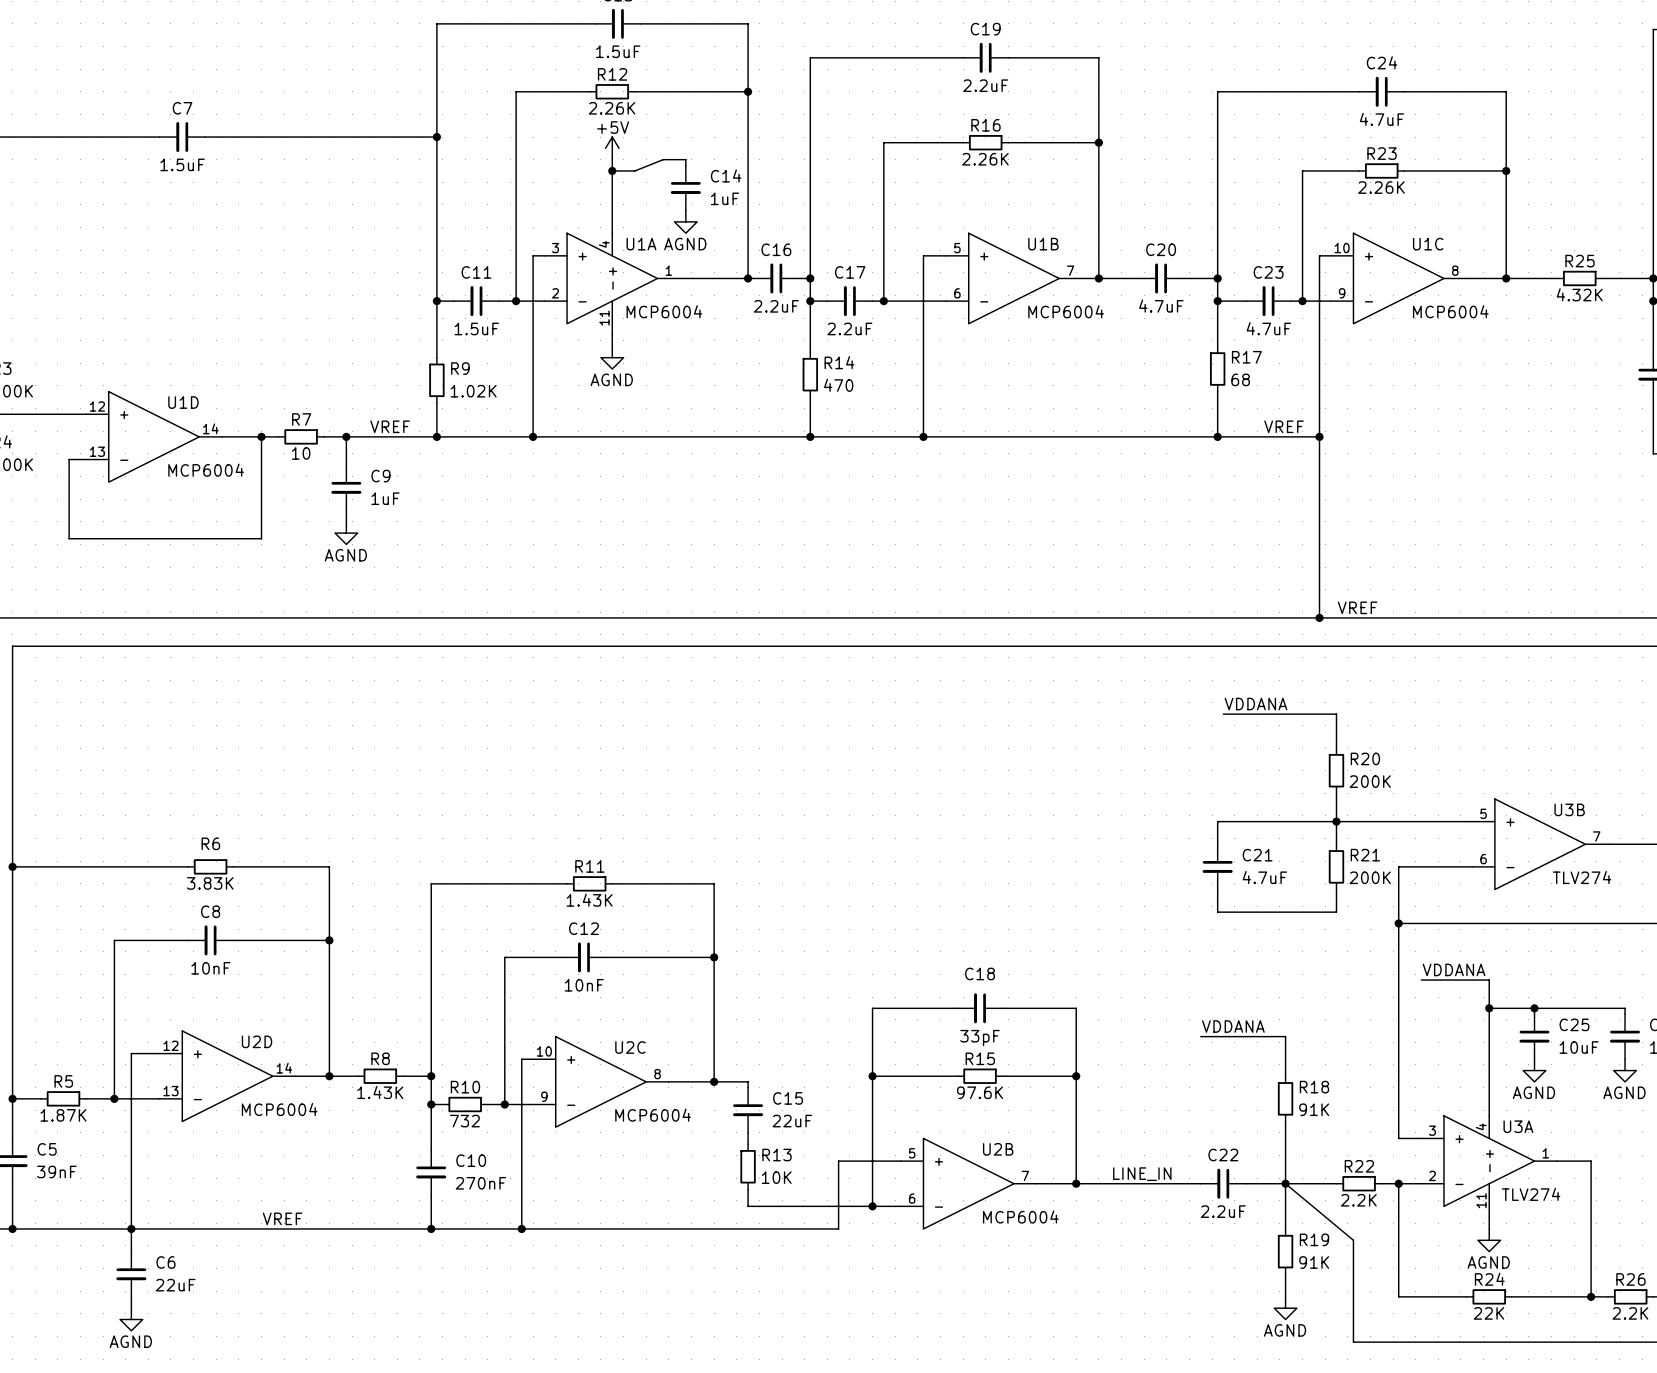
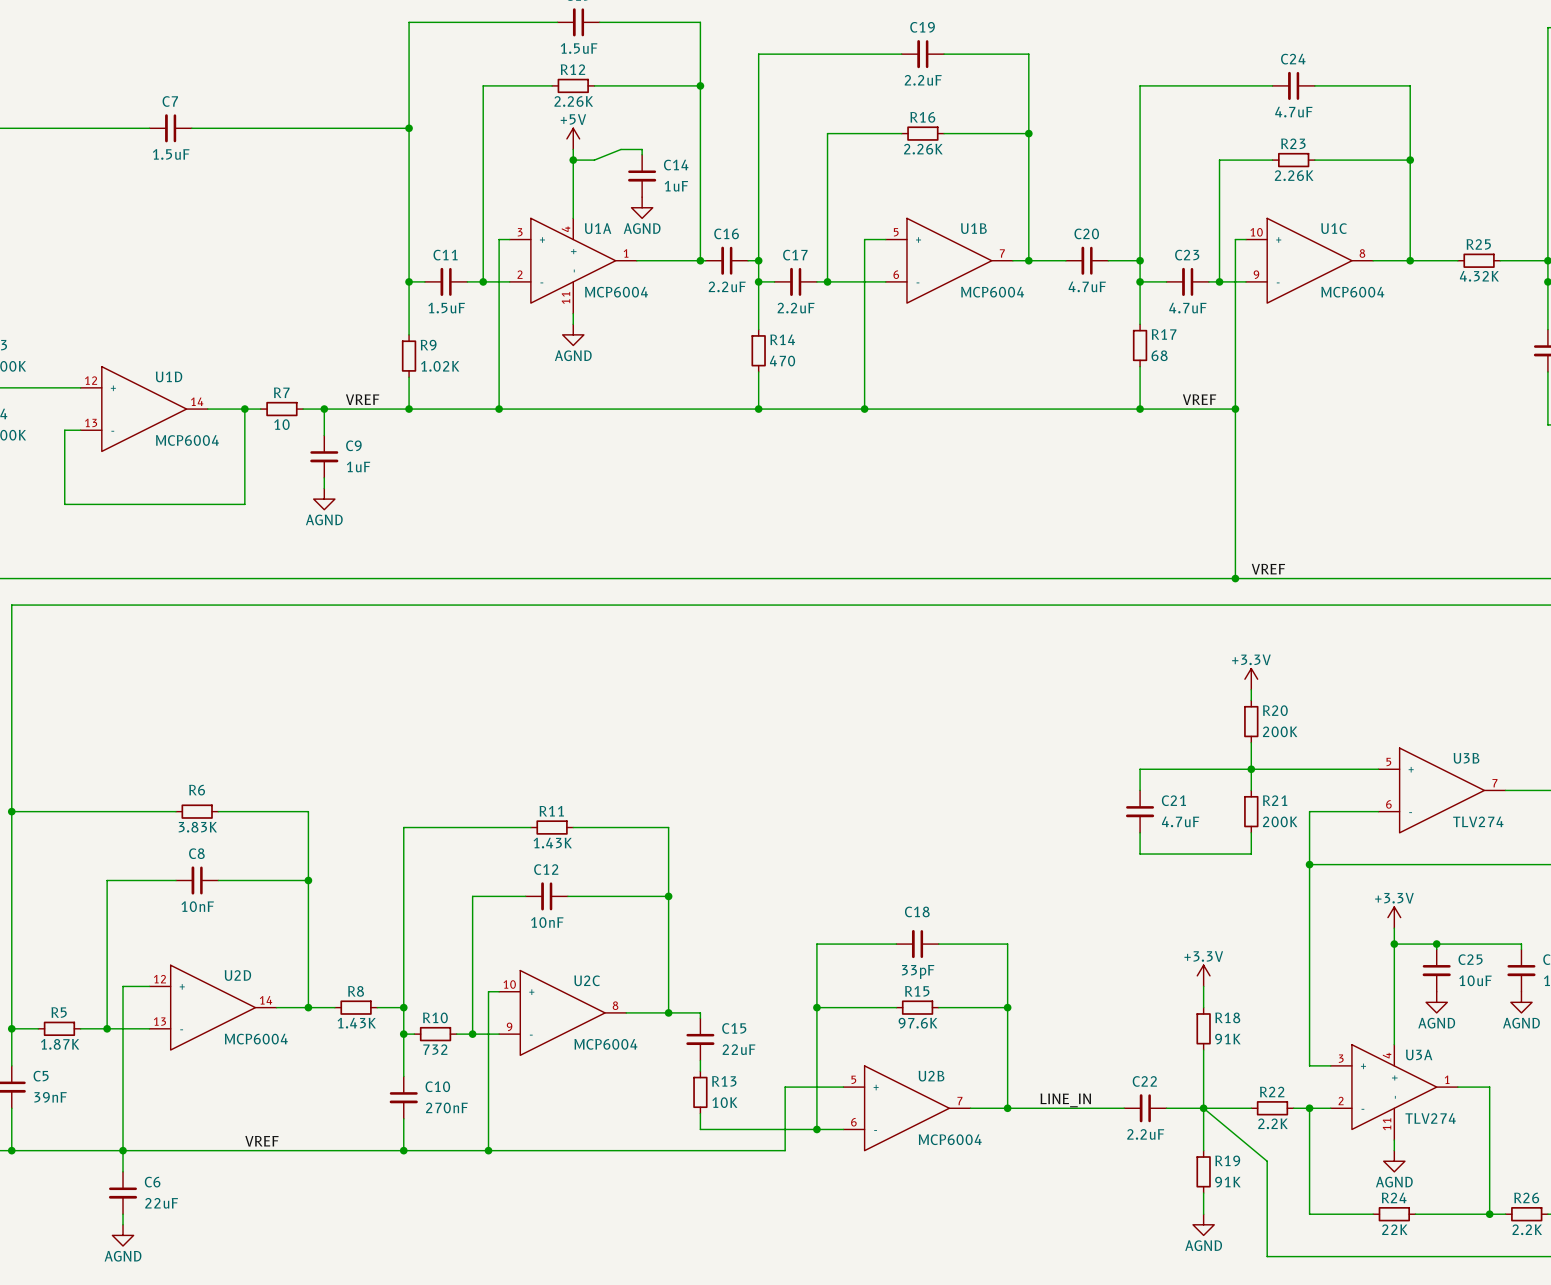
label: VDDANA (1256, 704) -> none
wire: (1223, 714) (1336, 714) (1336, 736) -> none
power symbol: none -> +3.3V (1251, 679)
label: VDDANA (1454, 969) -> none
wire: (1421, 980) (1489, 980) (1489, 991) -> none
power symbol: none -> +3.3V (1394, 917)
label: VDDANA (1233, 1026) -> none
wire: (1200, 1036) (1285, 1036) (1285, 1053) -> none
power symbol: none -> +3.3V (1203, 975)

